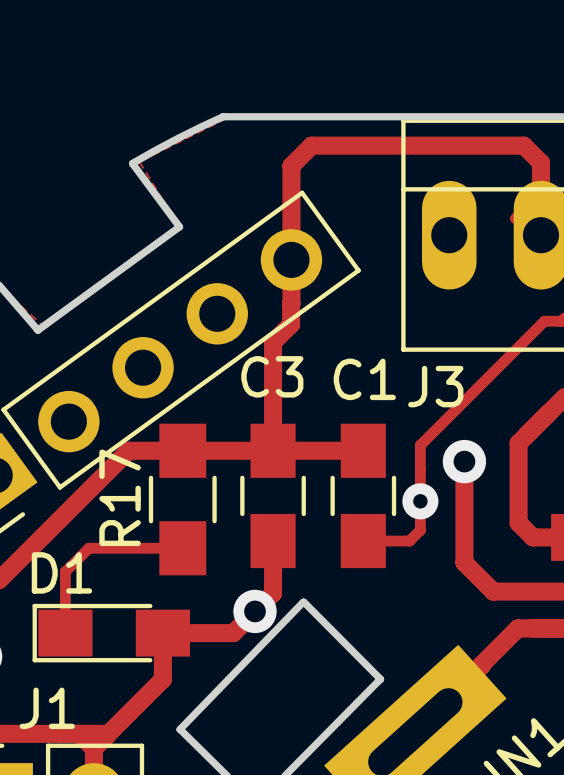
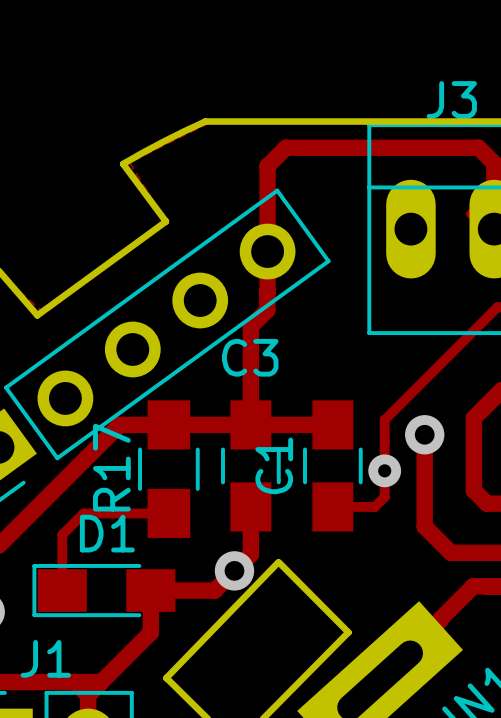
C1 name rotation: 0° (364, 379) -> 90° counterclockwise (274, 465)
C1 name position: C1 (364, 379) -> C1 (274, 465)
J3 name position: J3 (435, 386) -> J3 (451, 99)
D1 name position: D1 (61, 572) -> D1 (107, 533)

